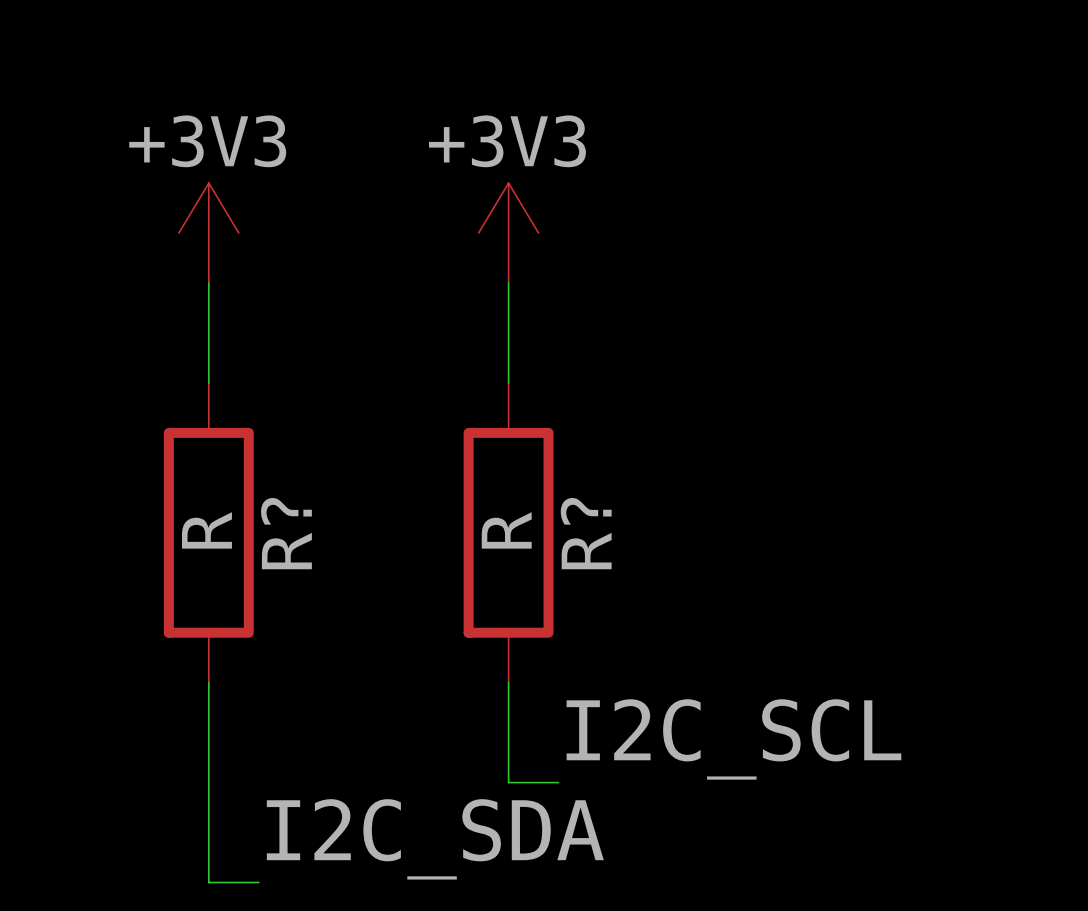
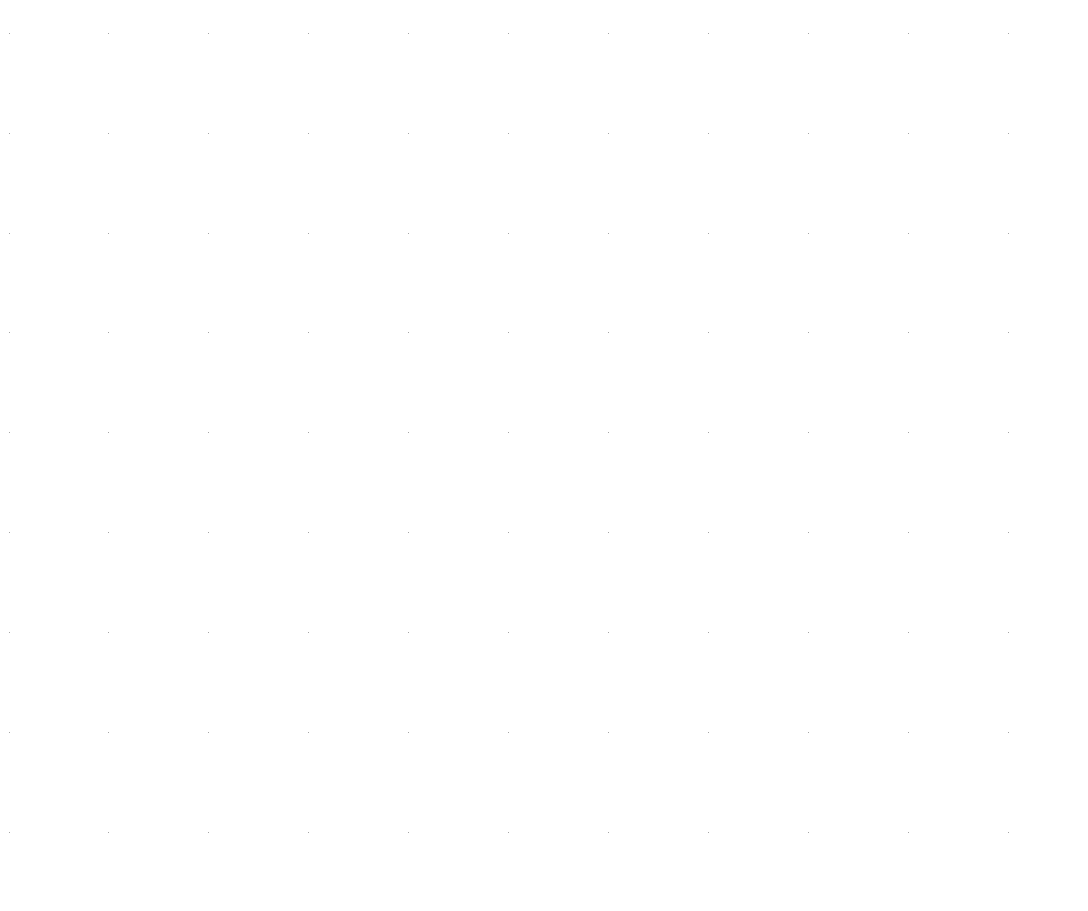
power symbol: +3V3 (208, 233) -> none
power symbol: +3V3 (508, 233) -> none
wire: (208, 283) (208, 382) -> none
wire: (508, 283) (508, 382) -> none
R?: R (208, 532) -> none
R?: R (508, 532) -> none
wire: (208, 682) (208, 882) (258, 882) -> none
wire: (508, 682) (508, 782) (558, 782) -> none
label: I2C_SCL (733, 739) -> none
label: I2C_SDA (435, 839) -> none

